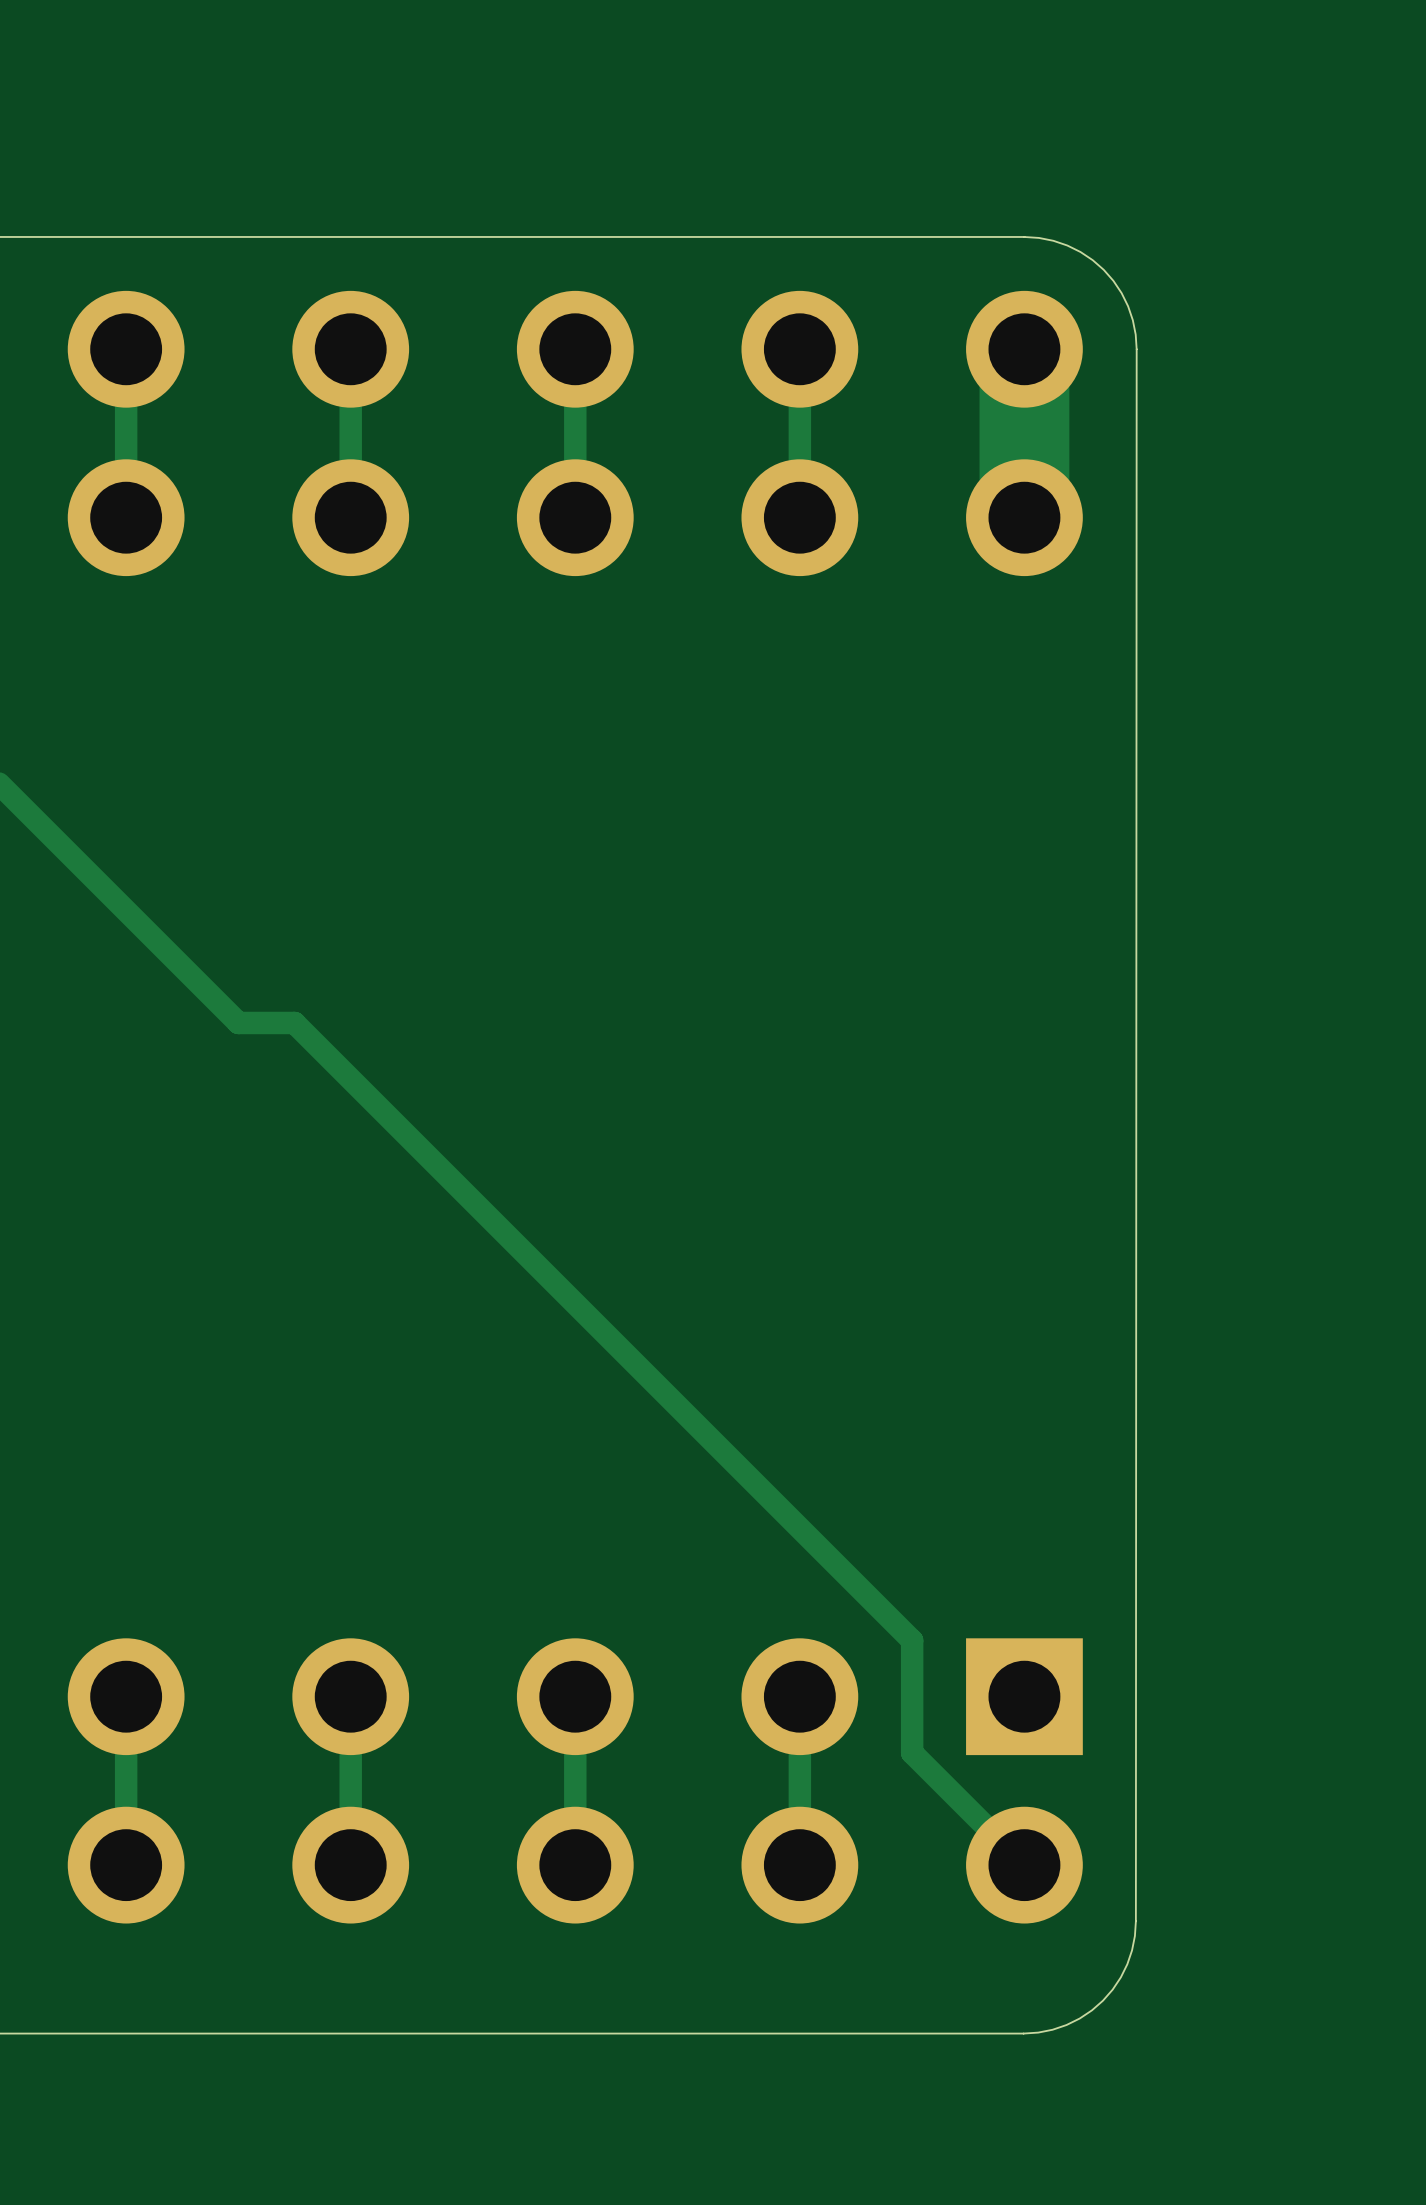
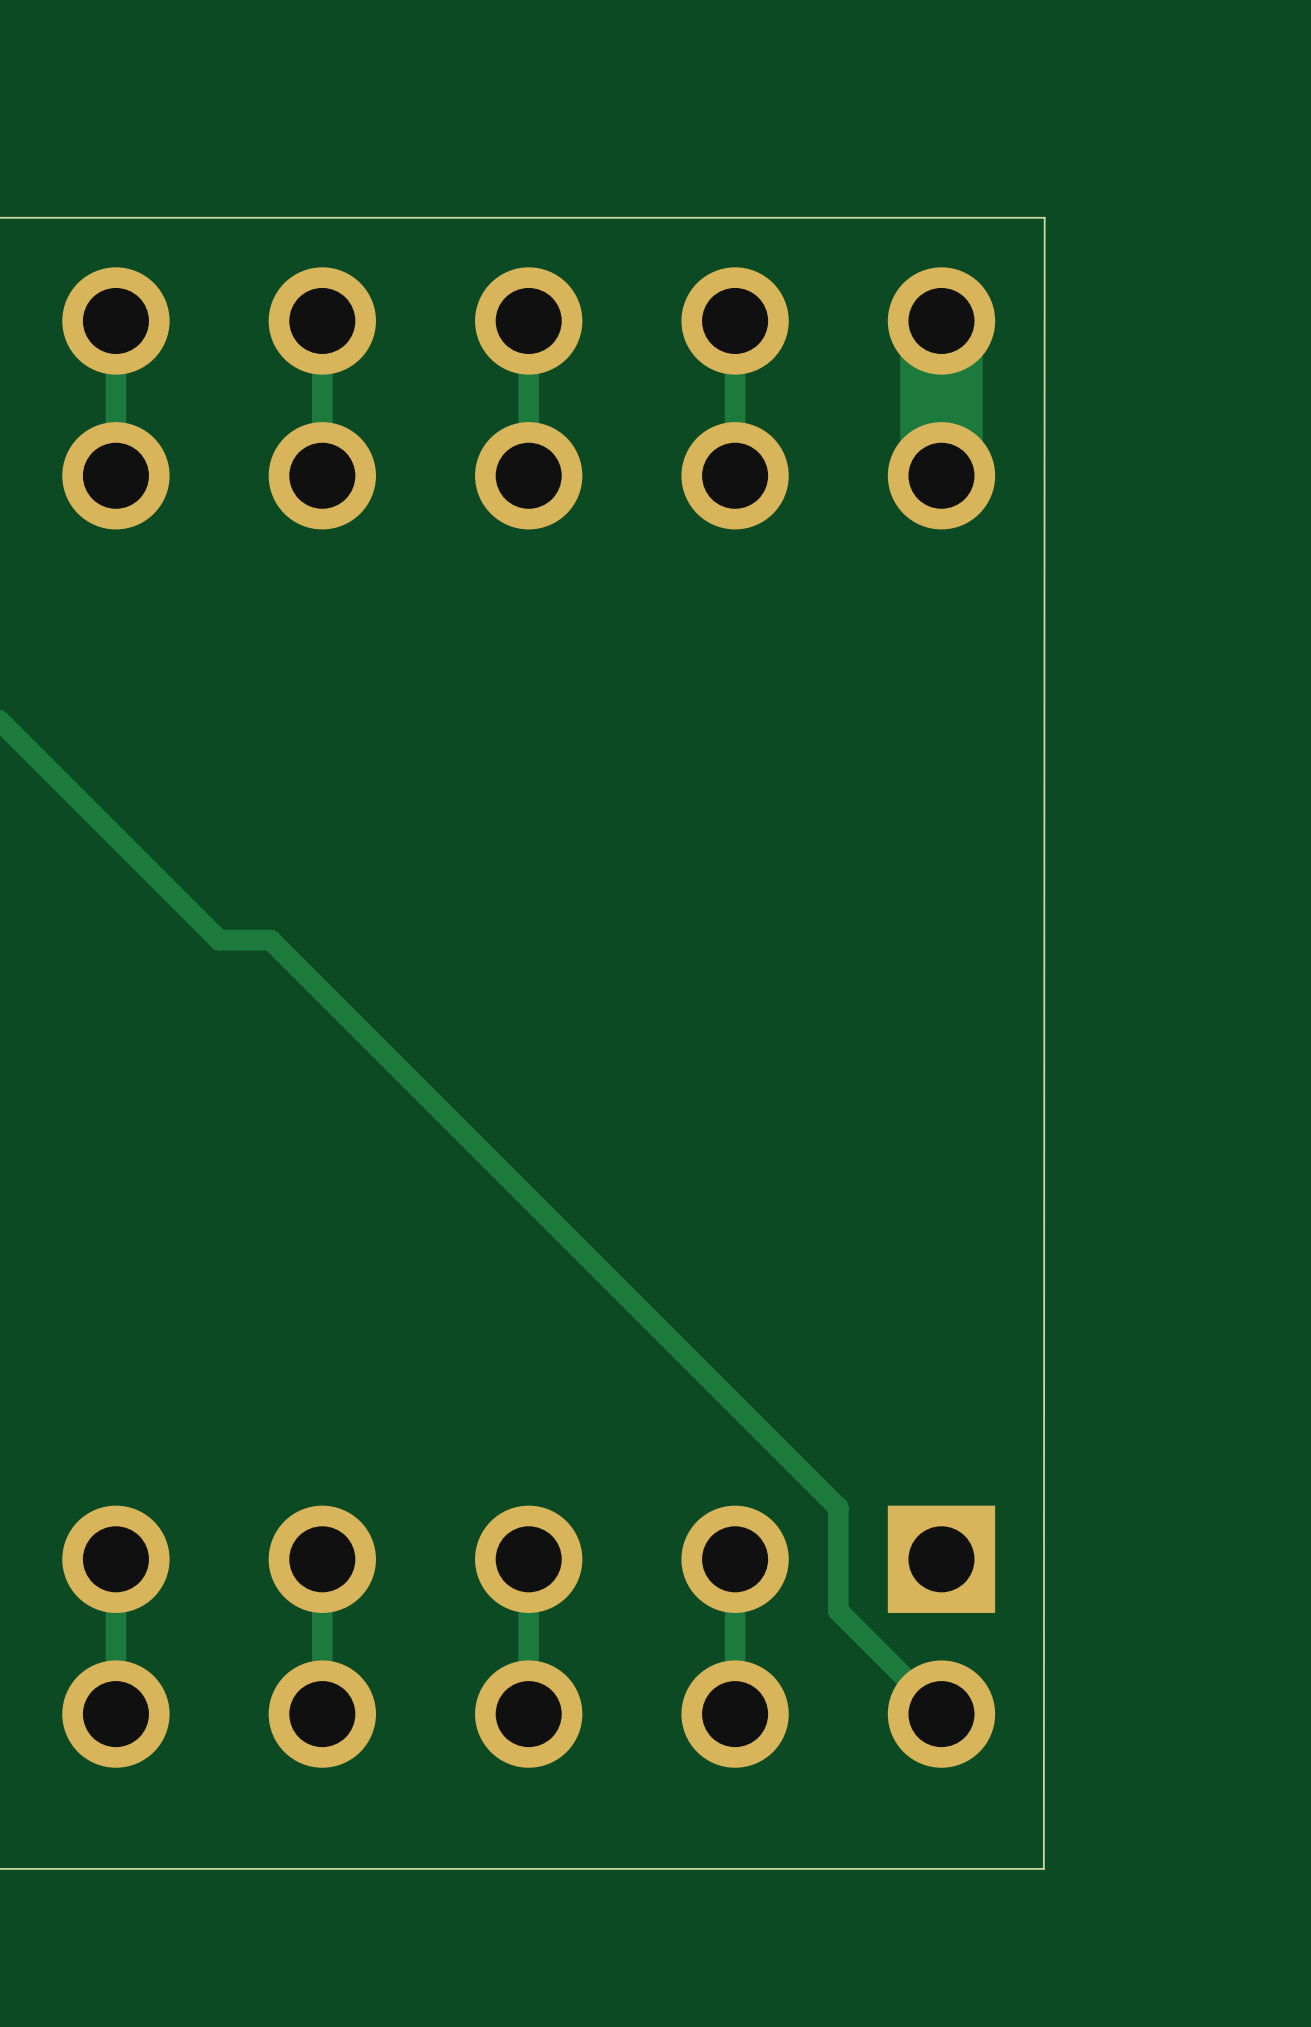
board edge: (1024, 236) (1053, 240) (1067, 245) (1080, 252) (1103, 269) (1121, 293) (1128, 306) (1132, 320) (1136, 349) -> (941, 217) (1044, 217) (1044, 320)
board edge: (1135, 1921) (1132, 1950) (1127, 1964) (1112, 1989) (1103, 2000) (1079, 2018) (1066, 2025) (1052, 2029) (1023, 2033) -> (1043, 1765) (1043, 1868) (940, 1868)

